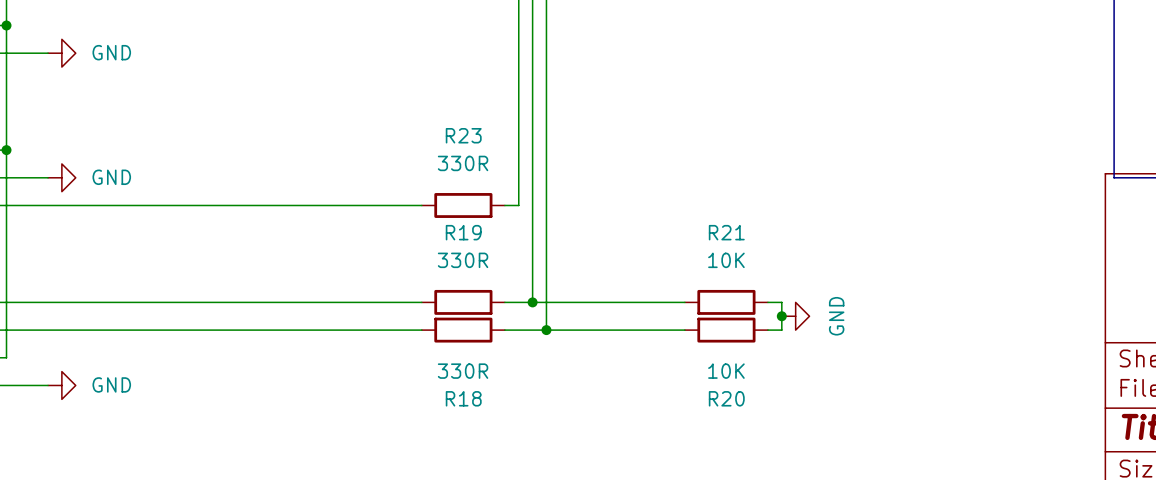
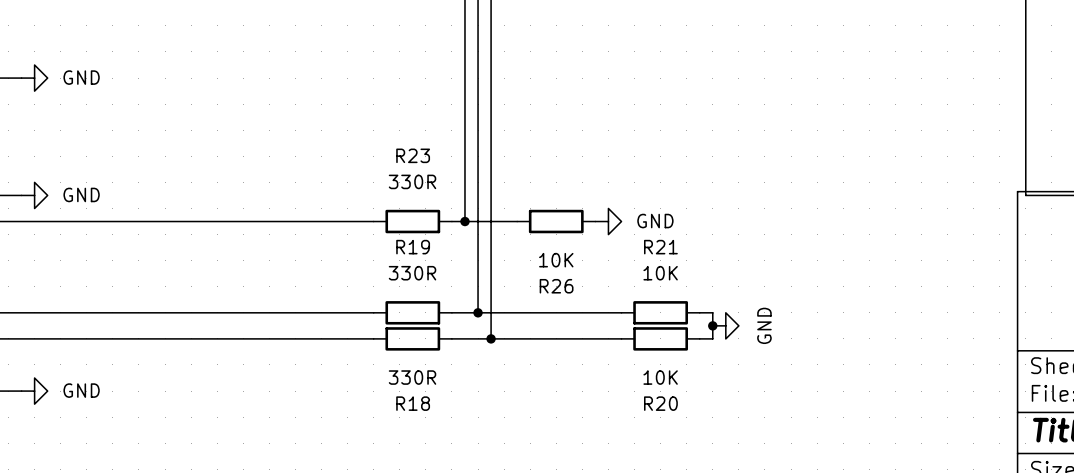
wire: none -> (464, 221) (517, 221)
junction: none -> (464, 221)
R26: none -> 10K (556, 221)
power symbol: none -> GND (608, 221)

